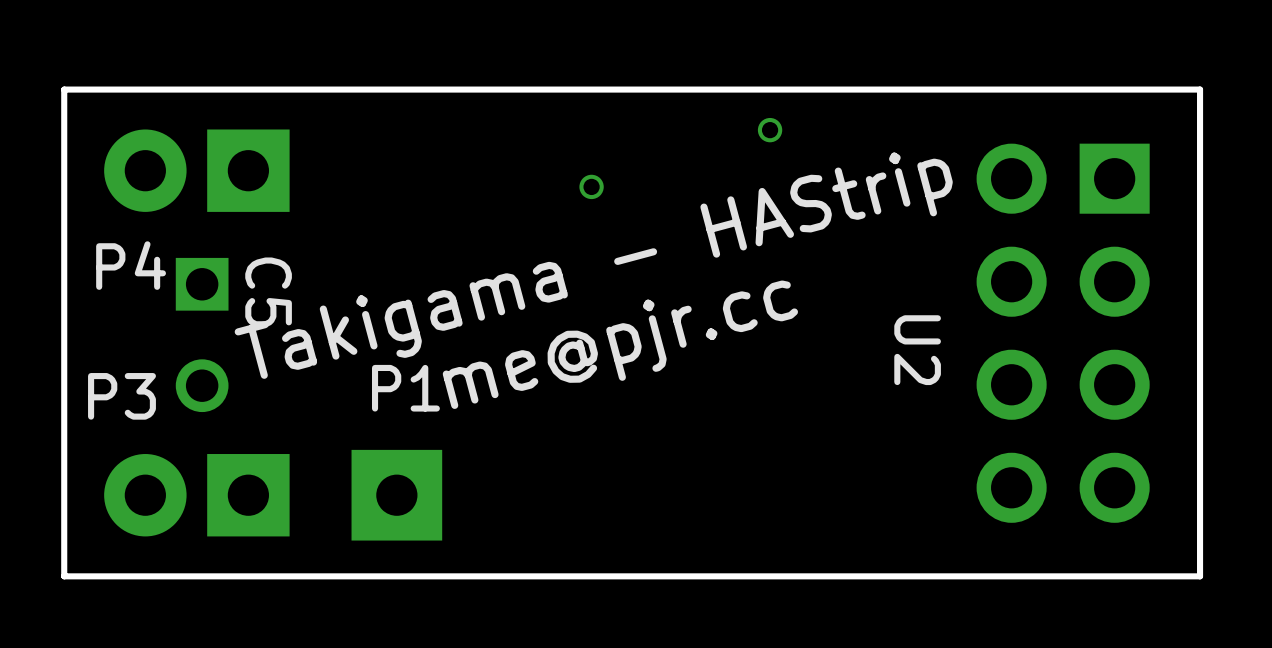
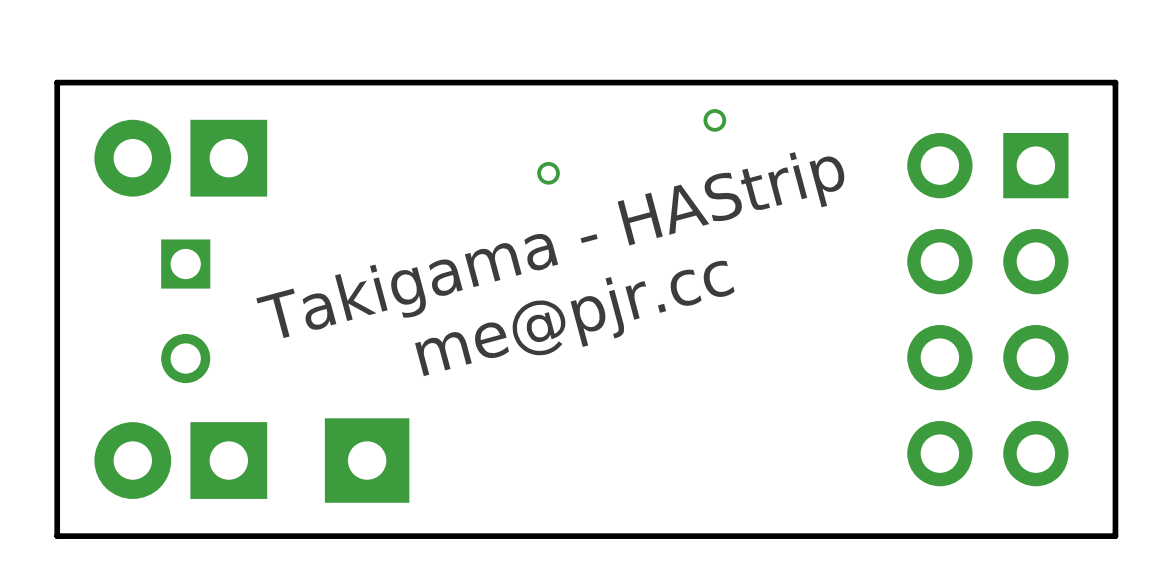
P4 name: P4 (131, 265) -> none
C5 name: C5 (268, 292) -> none
U2 name: U2 (917, 350) -> none
P1 name: P1 (405, 388) -> none
P3 name: P3 (121, 396) -> none

